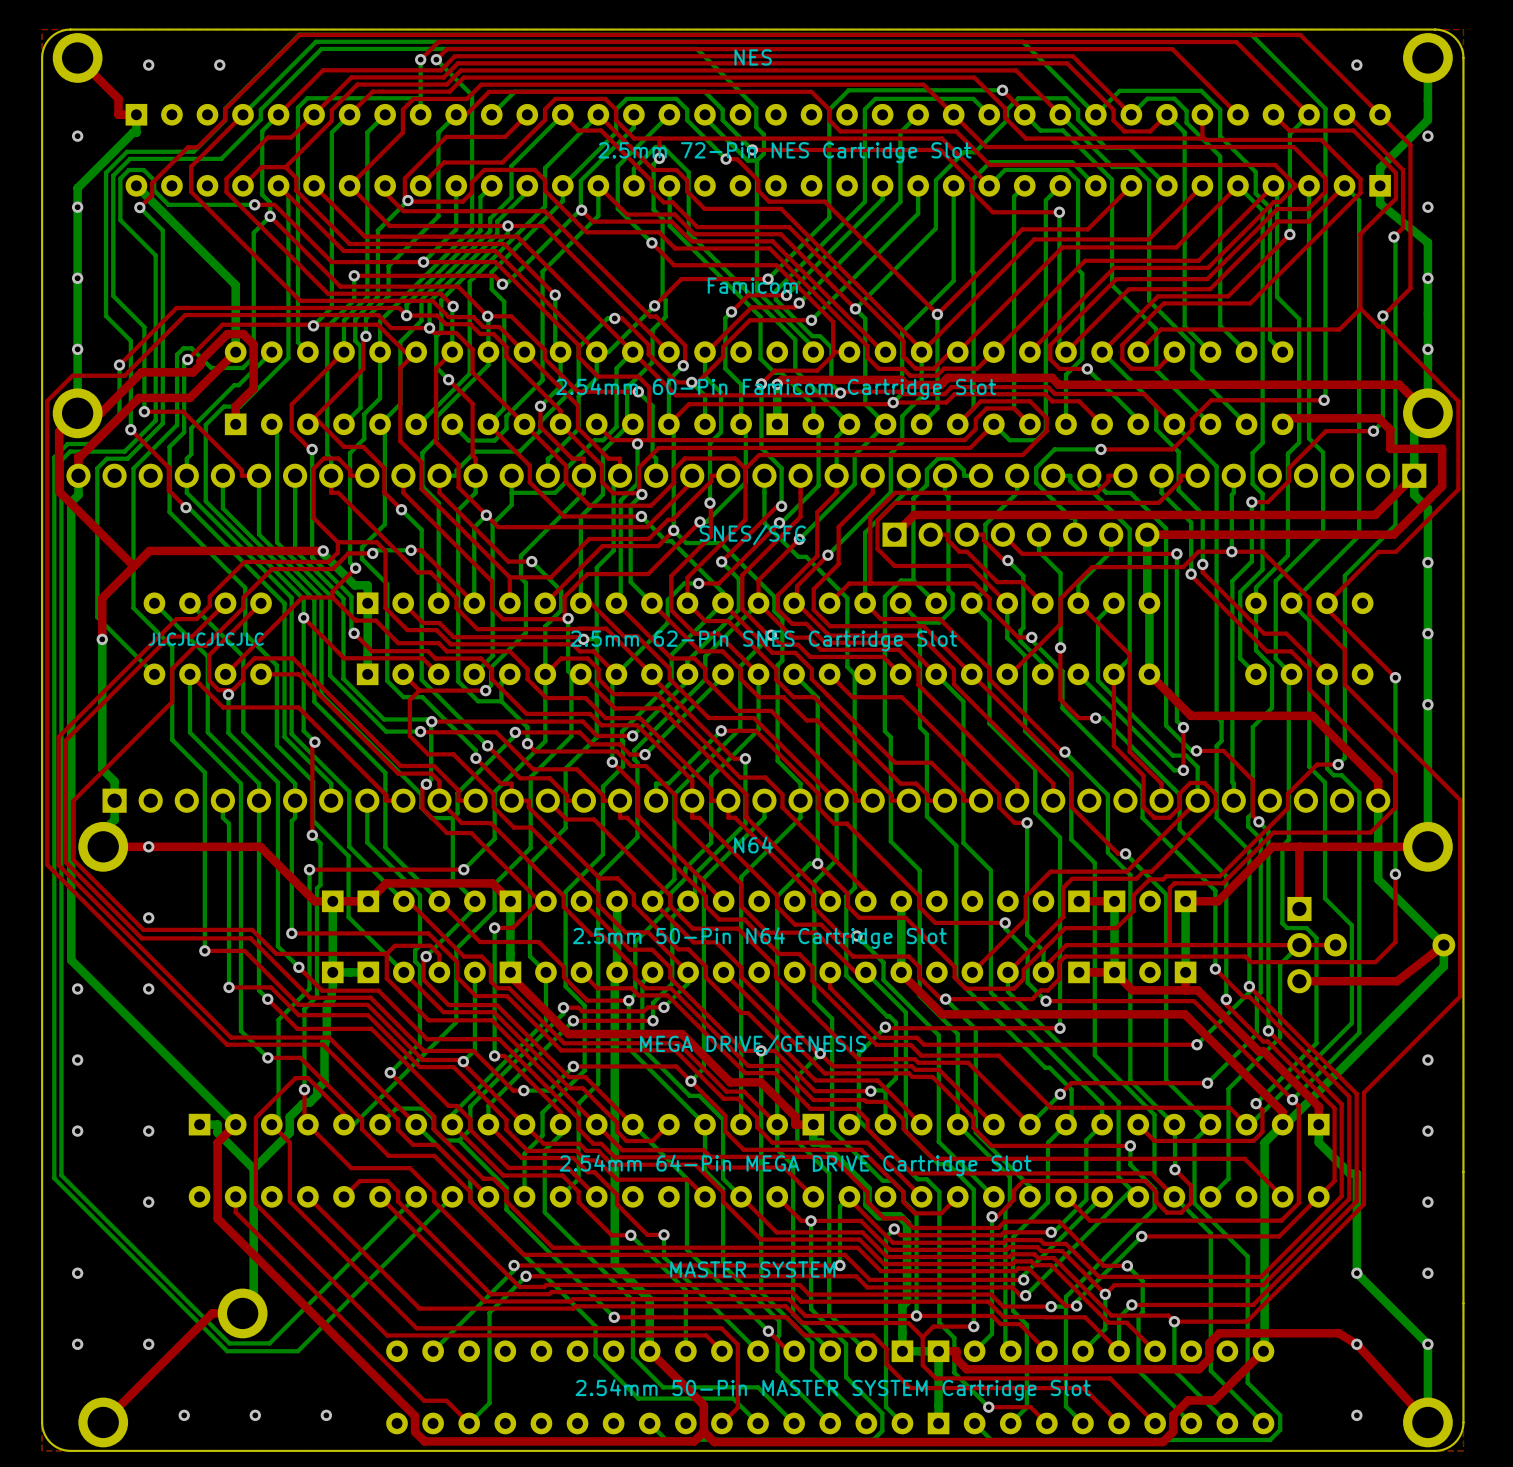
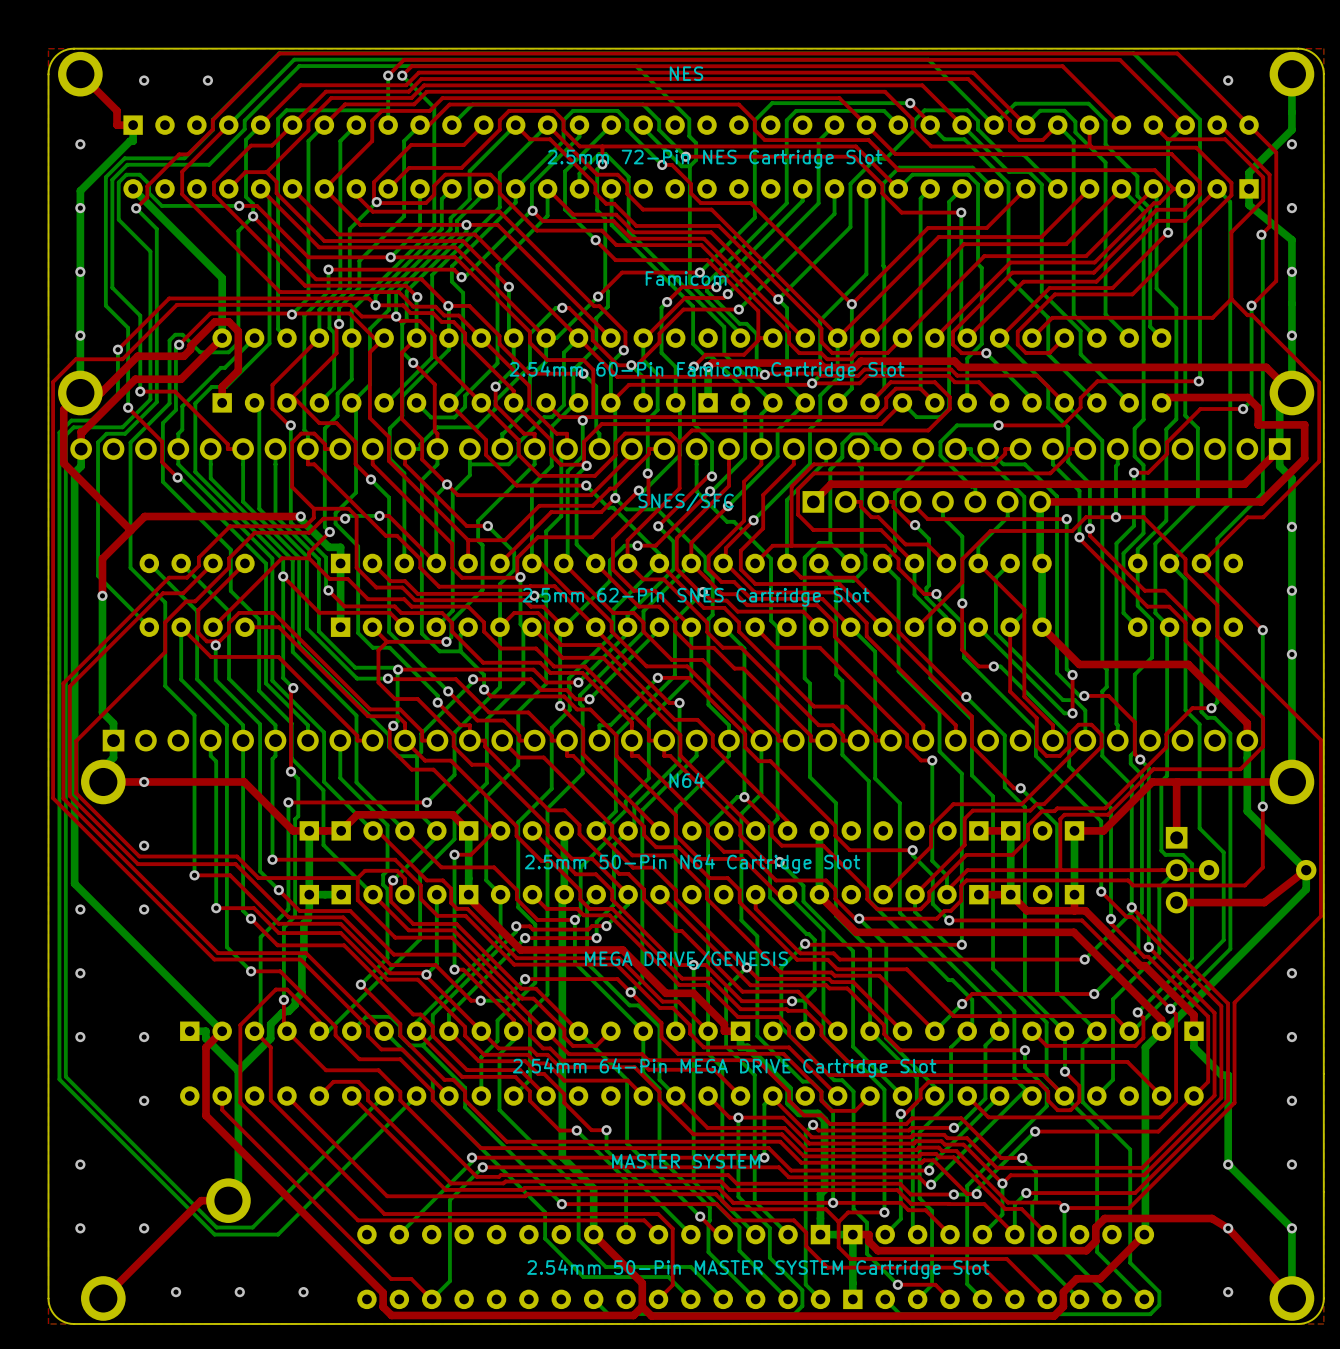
text: JLCJLCJLCJLC (206, 639) -> none

